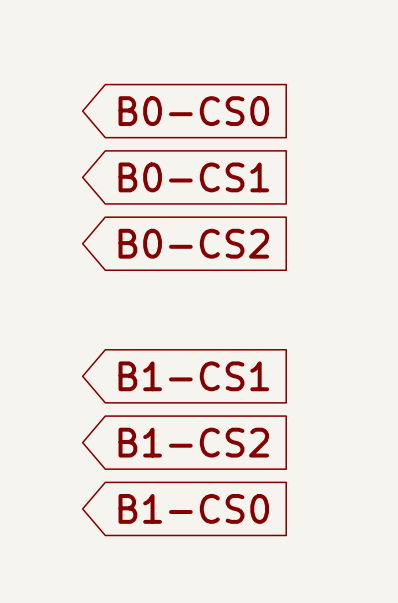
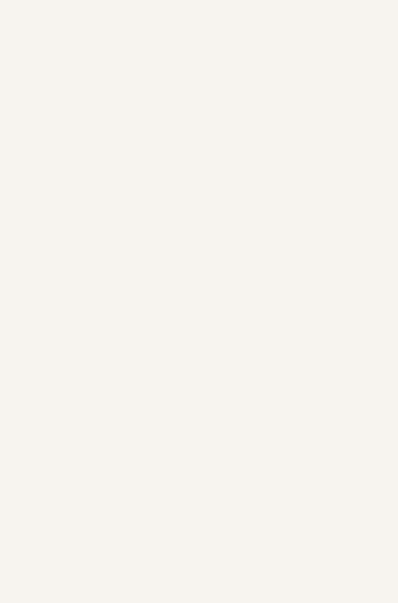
global label: B0-CS0 (193, 111) -> none
global label: B0-CS1 (193, 177) -> none
global label: B0-CS2 (193, 243) -> none
global label: B1-CS1 (193, 376) -> none
global label: B1-CS2 (193, 442) -> none
global label: B1-CS0 (193, 508) -> none

